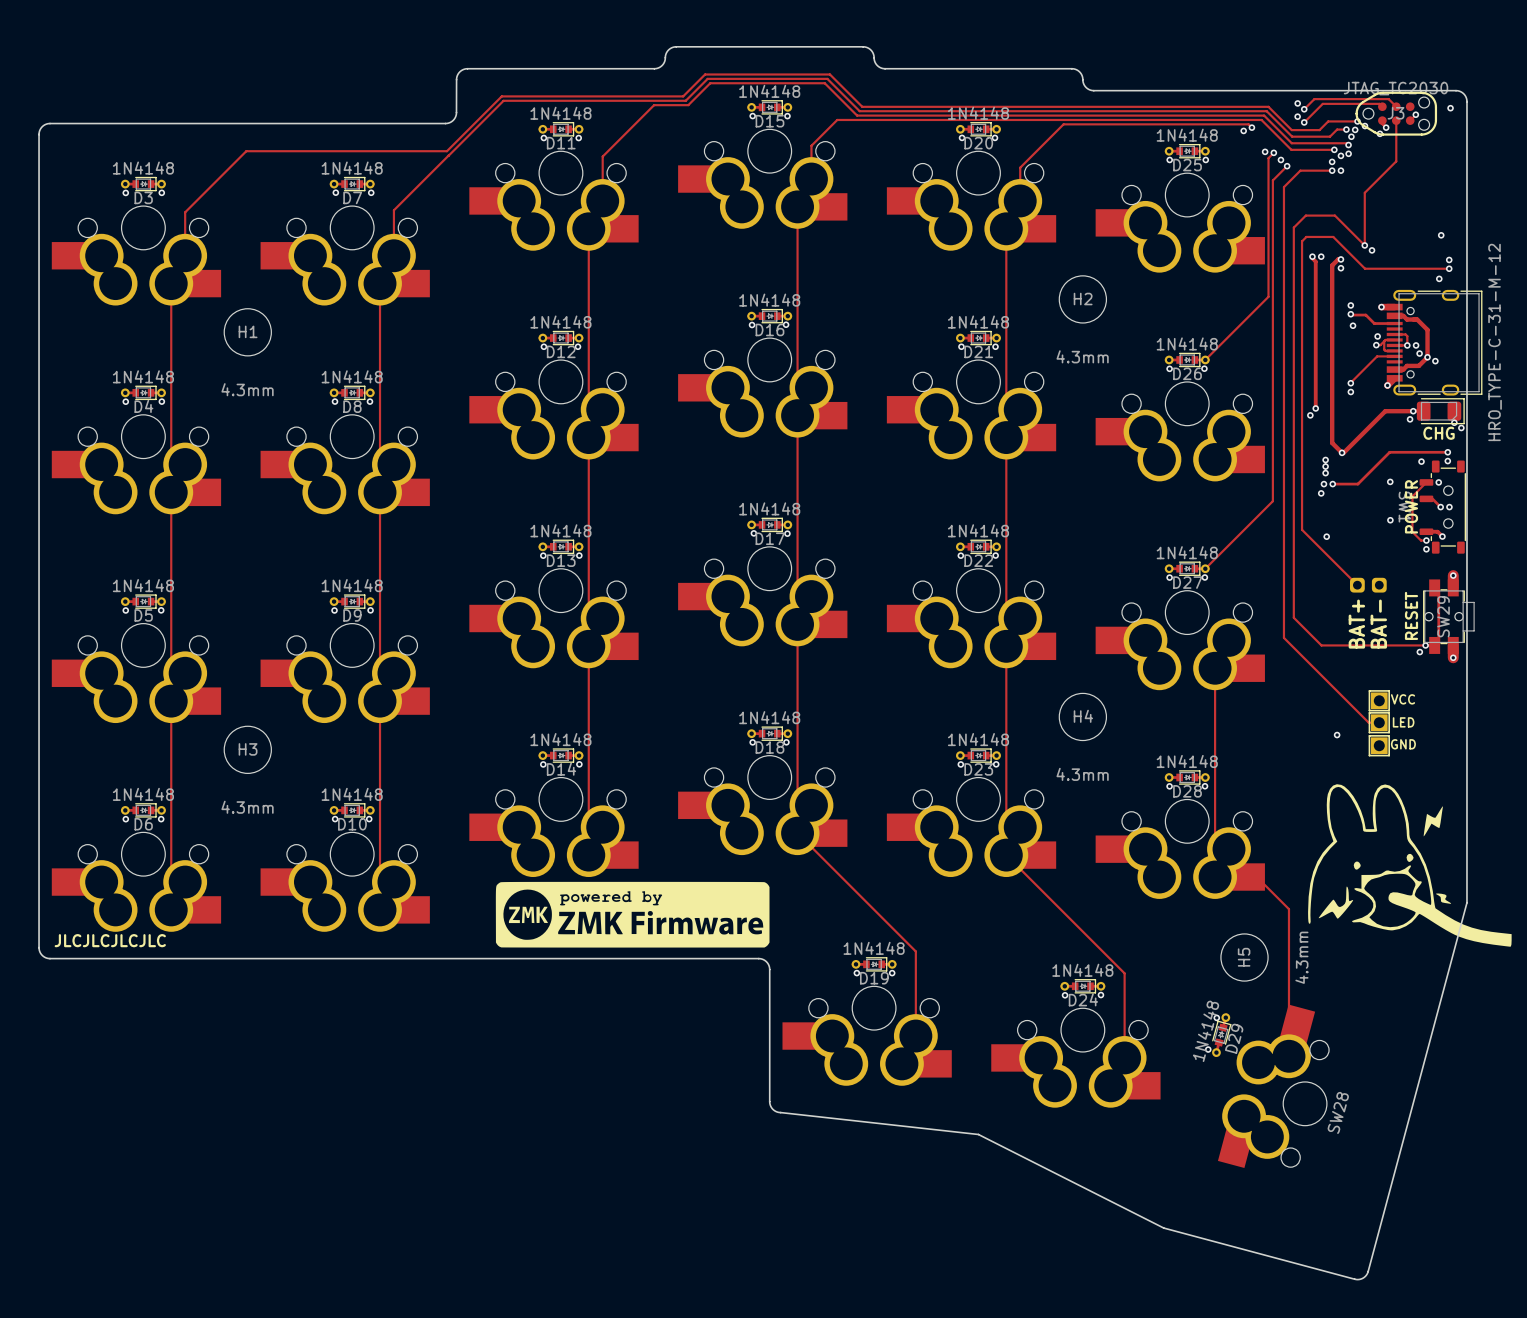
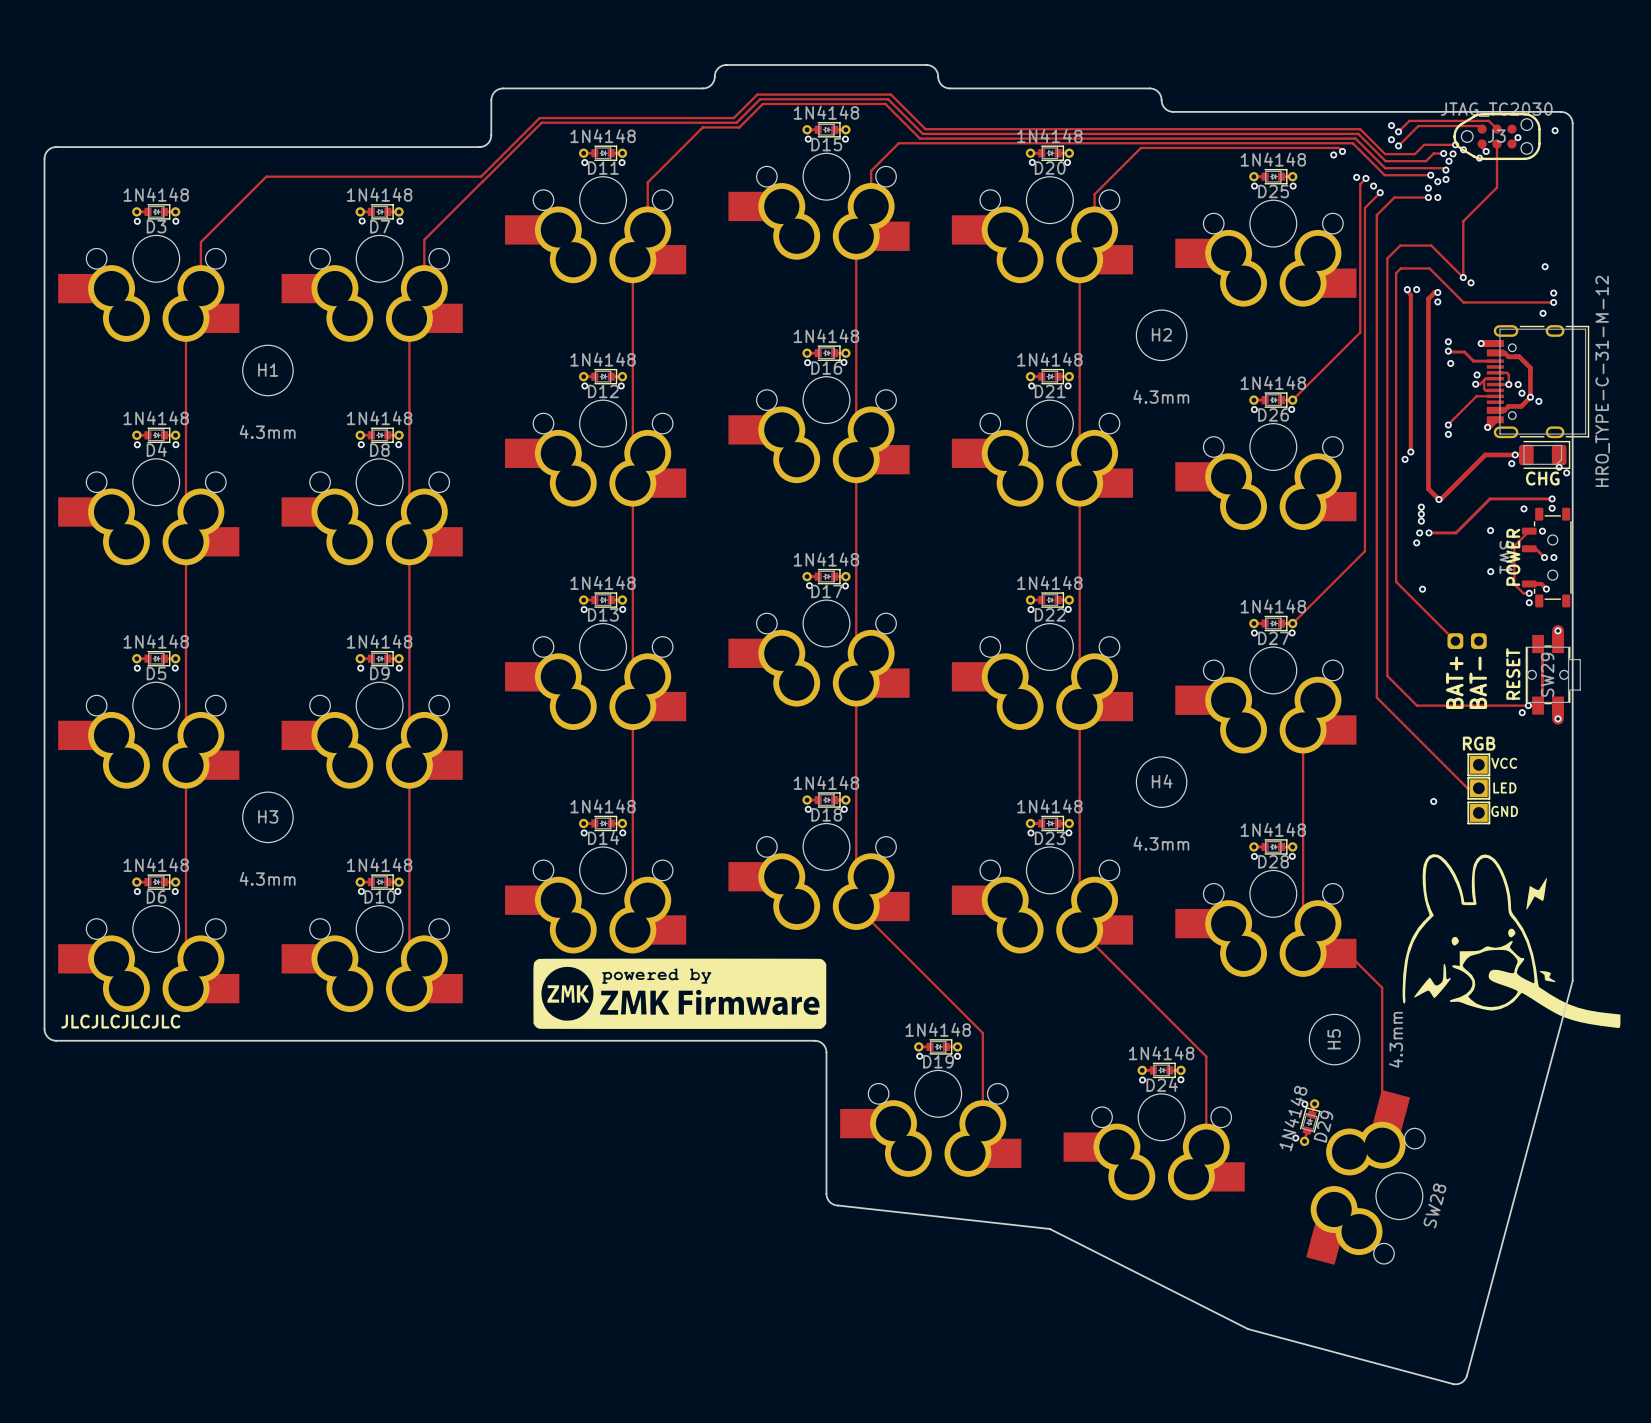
text: none -> RGB (1479, 743)

